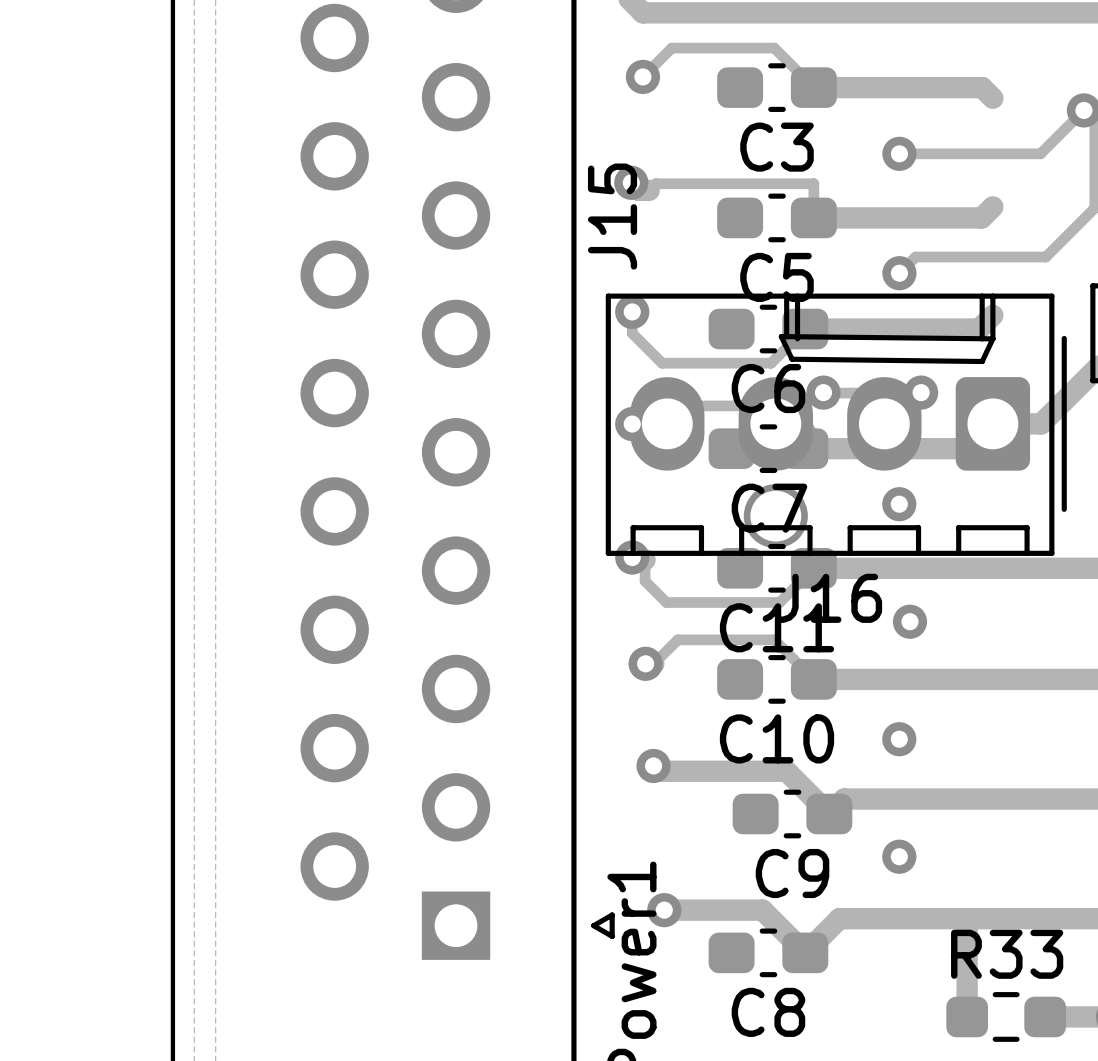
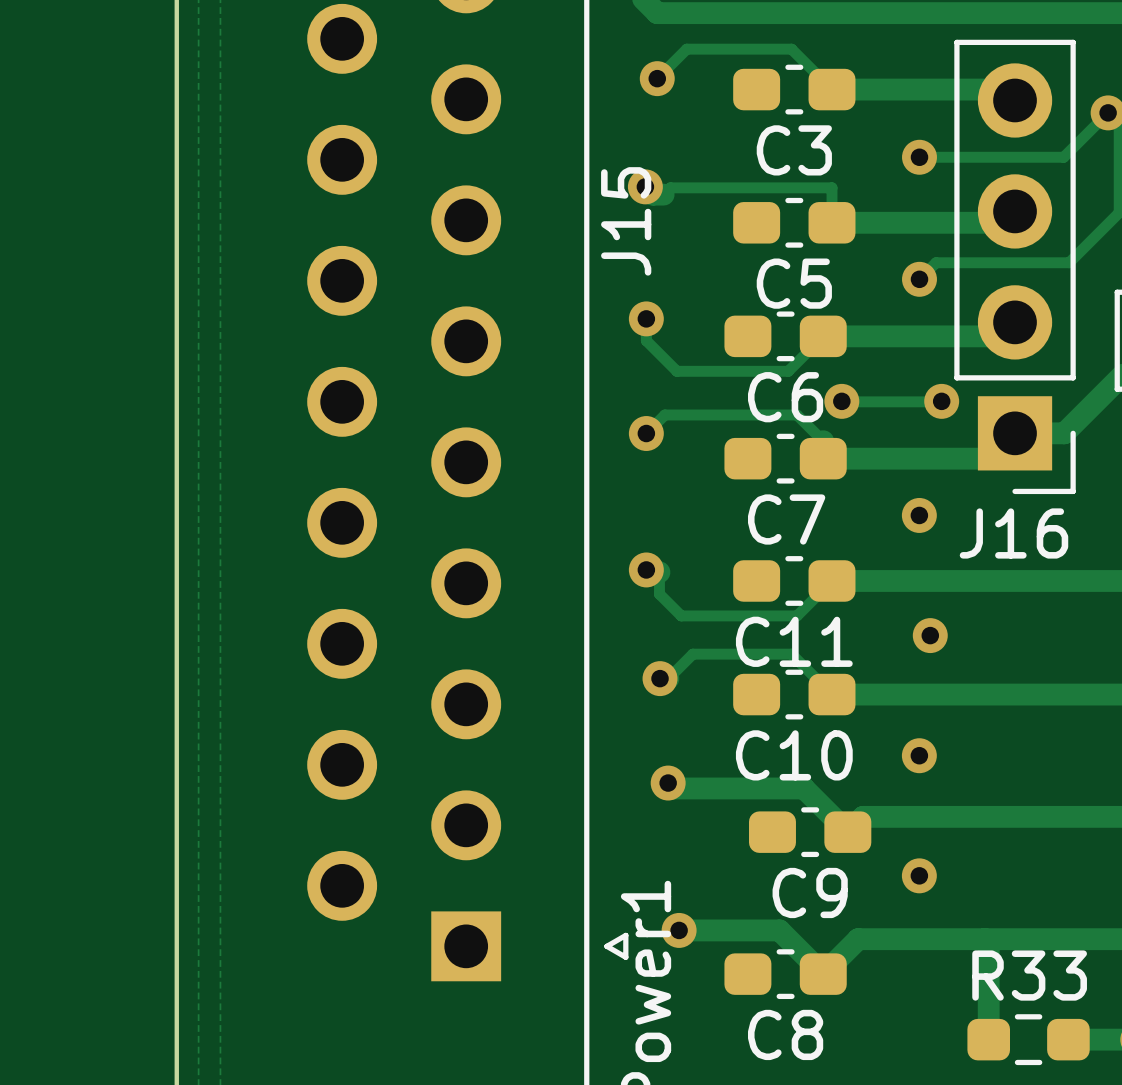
J16 footprint: [605, 291, 1067, 556] -> [954, 39, 1076, 495]
J16 name position: J16 (829, 598) -> J16 (1013, 533)

